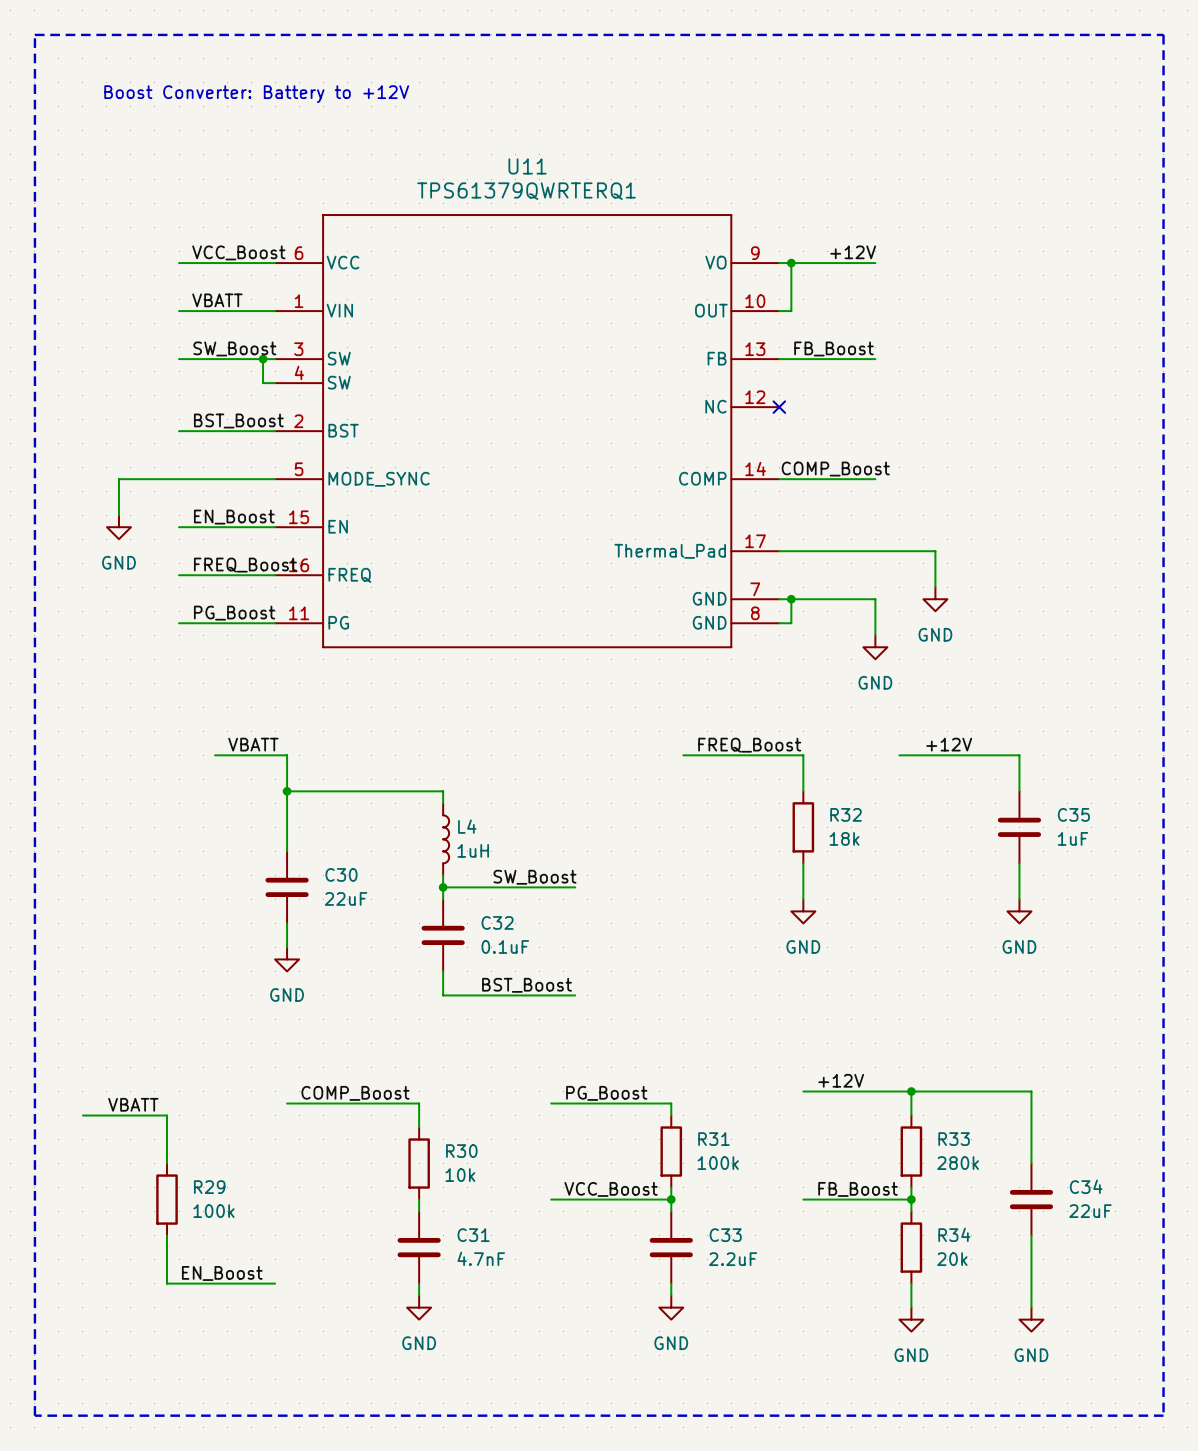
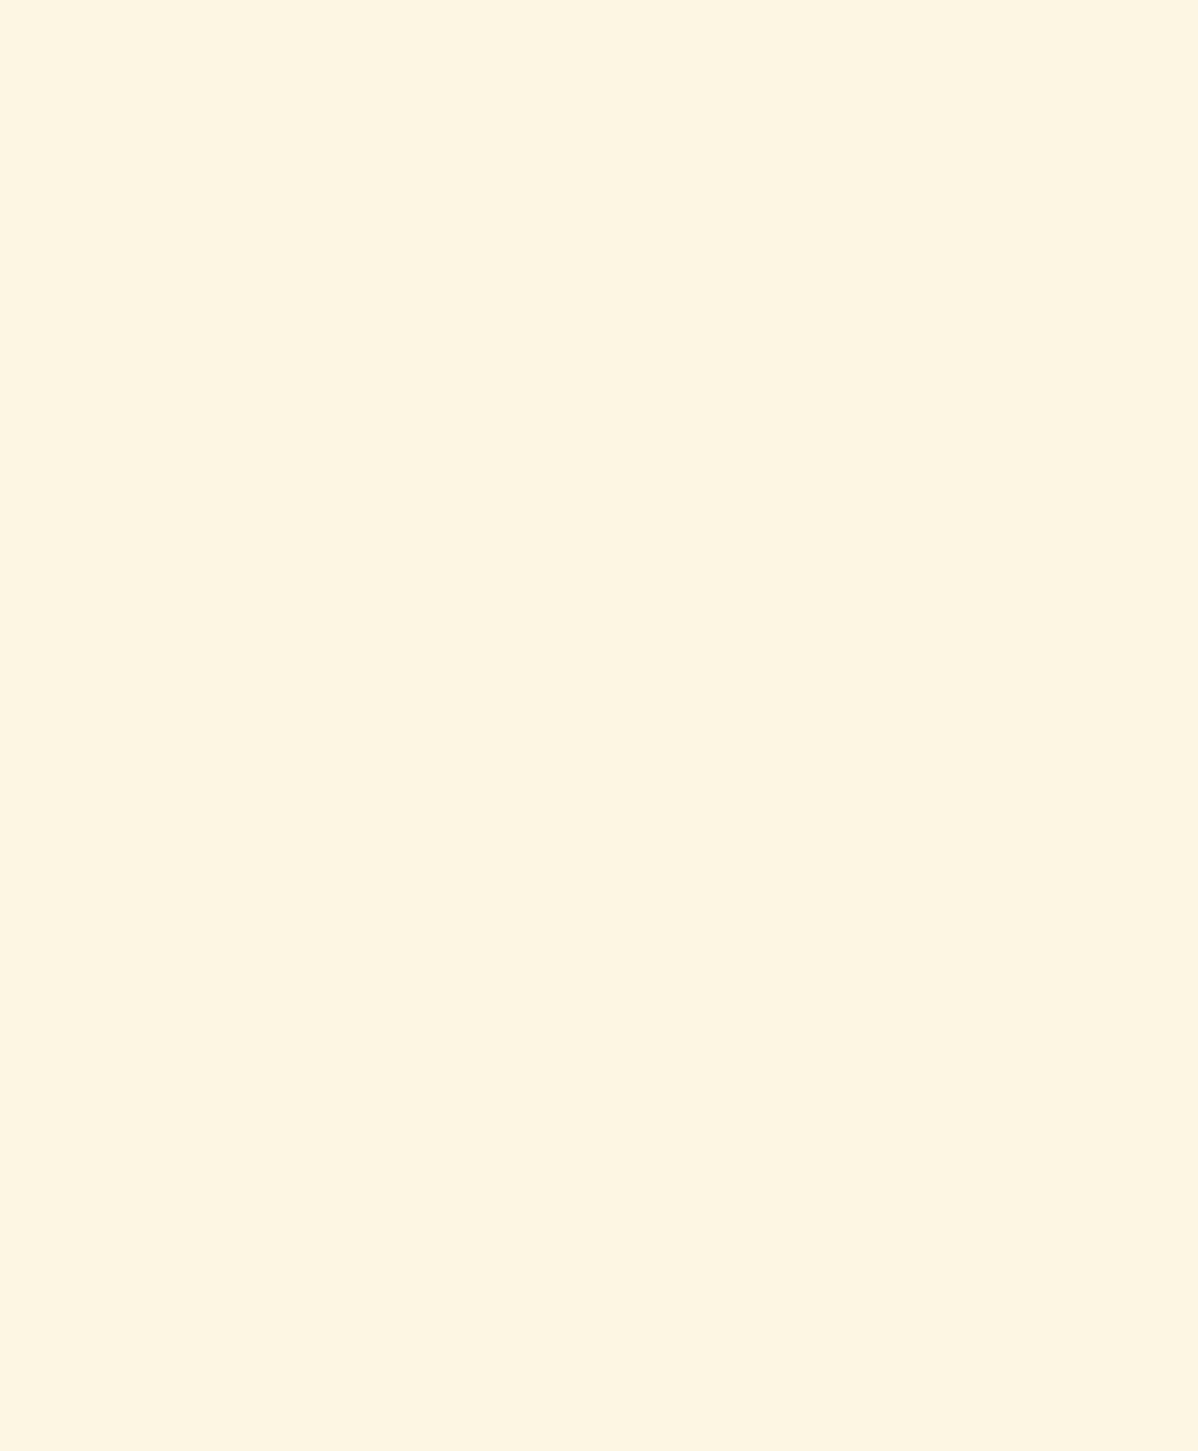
line: (34, 34) (1163, 34) (1163, 1415) (34, 1415) (34, 34) -> none
text: Boost Converter: Battery to +12V (256, 94) -> none
label: VCC_Boost (238, 252) -> none
label: +12V (853, 252) -> none
wire: (179, 263) (275, 263) -> none
wire: (779, 263) (875, 263) -> none
wire: (791, 263) (791, 311) (779, 311) -> none
junction: (791, 263) -> none
label: VBATT (217, 300) -> none
wire: (179, 311) (275, 311) -> none
label: SW_Boost (234, 348) -> none
label: FB_Boost (834, 348) -> none
wire: (179, 359) (275, 359) -> none
wire: (263, 359) (263, 383) (275, 383) -> none
junction: (263, 359) -> none
wire: (779, 359) (875, 359) -> none
no-connect mark: (779, 407) -> none
label: BST_Boost (238, 421) -> none
wire: (179, 431) (275, 431) -> none
U11: TPS61379QWRTERQ1 (527, 431) -> none
label: COMP_Boost (835, 469) -> none
wire: (275, 479) (118, 479) (118, 515) -> none
wire: (779, 479) (875, 479) -> none
label: EN_Boost (234, 517) -> none
power symbol: GND (118, 527) -> none
wire: (179, 527) (275, 527) -> none
wire: (779, 551) (935, 551) (935, 587) -> none
label: FREQ_Boost (245, 565) -> none
wire: (179, 575) (275, 575) -> none
wire: (779, 599) (875, 599) (875, 635) -> none
wire: (791, 599) (791, 623) (779, 623) -> none
junction: (791, 599) -> none
power symbol: GND (935, 599) -> none
label: PG_Boost (234, 613) -> none
wire: (179, 623) (275, 623) -> none
power symbol: GND (875, 647) -> none
label: VBATT (253, 744) -> none
label: +12V (949, 744) -> none
label: FREQ_Boost (749, 745) -> none
wire: (215, 755) (287, 755) (287, 851) -> none
wire: (683, 755) (803, 755) (803, 791) -> none
wire: (899, 755) (1019, 755) (1019, 791) -> none
wire: (287, 791) (443, 791) (443, 803) -> none
junction: (287, 791) -> none
R32: 18k (803, 827) -> none
C35: 1uF (1019, 827) -> none
L4: 1uH (446, 839) -> none
wire: (803, 863) (803, 899) -> none
wire: (1019, 863) (1019, 899) -> none
wire: (443, 875) (443, 899) -> none
label: SW_Boost (535, 877) -> none
C30: 22uF (287, 887) -> none
wire: (443, 887) (575, 887) -> none
junction: (443, 887) -> none
power symbol: GND (803, 911) -> none
power symbol: GND (1019, 911) -> none
wire: (287, 923) (287, 947) -> none
C32: 0.1uF (443, 935) -> none
power symbol: GND (287, 959) -> none
wire: (443, 971) (443, 995) (575, 995) -> none
label: BST_Boost (527, 985) -> none
label: +12V (841, 1080) -> none
wire: (803, 1091) (1031, 1091) (1031, 1163) -> none
wire: (911, 1091) (911, 1115) -> none
junction: (911, 1091) -> none
label: COMP_Boost (355, 1093) -> none
label: PG_Boost (606, 1093) -> none
wire: (287, 1103) (419, 1103) (419, 1127) -> none
wire: (551, 1103) (671, 1103) (671, 1115) -> none
label: VBATT (133, 1104) -> none
wire: (82, 1115) (167, 1115) (167, 1163) -> none
R31: 100k (671, 1151) -> none
R33: 280k (911, 1151) -> none
R30: 10k (419, 1163) -> none
wire: (671, 1187) (671, 1211) -> none
wire: (911, 1187) (911, 1211) -> none
label: VCC_Boost (611, 1189) -> none
label: FB_Boost (858, 1189) -> none
R29: 100k (167, 1199) -> none
wire: (419, 1199) (419, 1211) -> none
wire: (551, 1199) (671, 1199) -> none
junction: (671, 1199) -> none
wire: (803, 1199) (911, 1199) -> none
junction: (911, 1199) -> none
C34: 22uF (1031, 1199) -> none
wire: (167, 1235) (167, 1283) (275, 1283) -> none
wire: (1031, 1235) (1031, 1307) -> none
C31: 4.7nF (419, 1247) -> none
C33: 2.2uF (671, 1247) -> none
R34: 20k (911, 1247) -> none
label: EN_Boost (222, 1273) -> none
wire: (419, 1283) (419, 1295) -> none
wire: (671, 1283) (671, 1295) -> none
wire: (911, 1283) (911, 1307) -> none
power symbol: GND (419, 1307) -> none
power symbol: GND (671, 1307) -> none
power symbol: GND (911, 1319) -> none
power symbol: GND (1031, 1319) -> none

